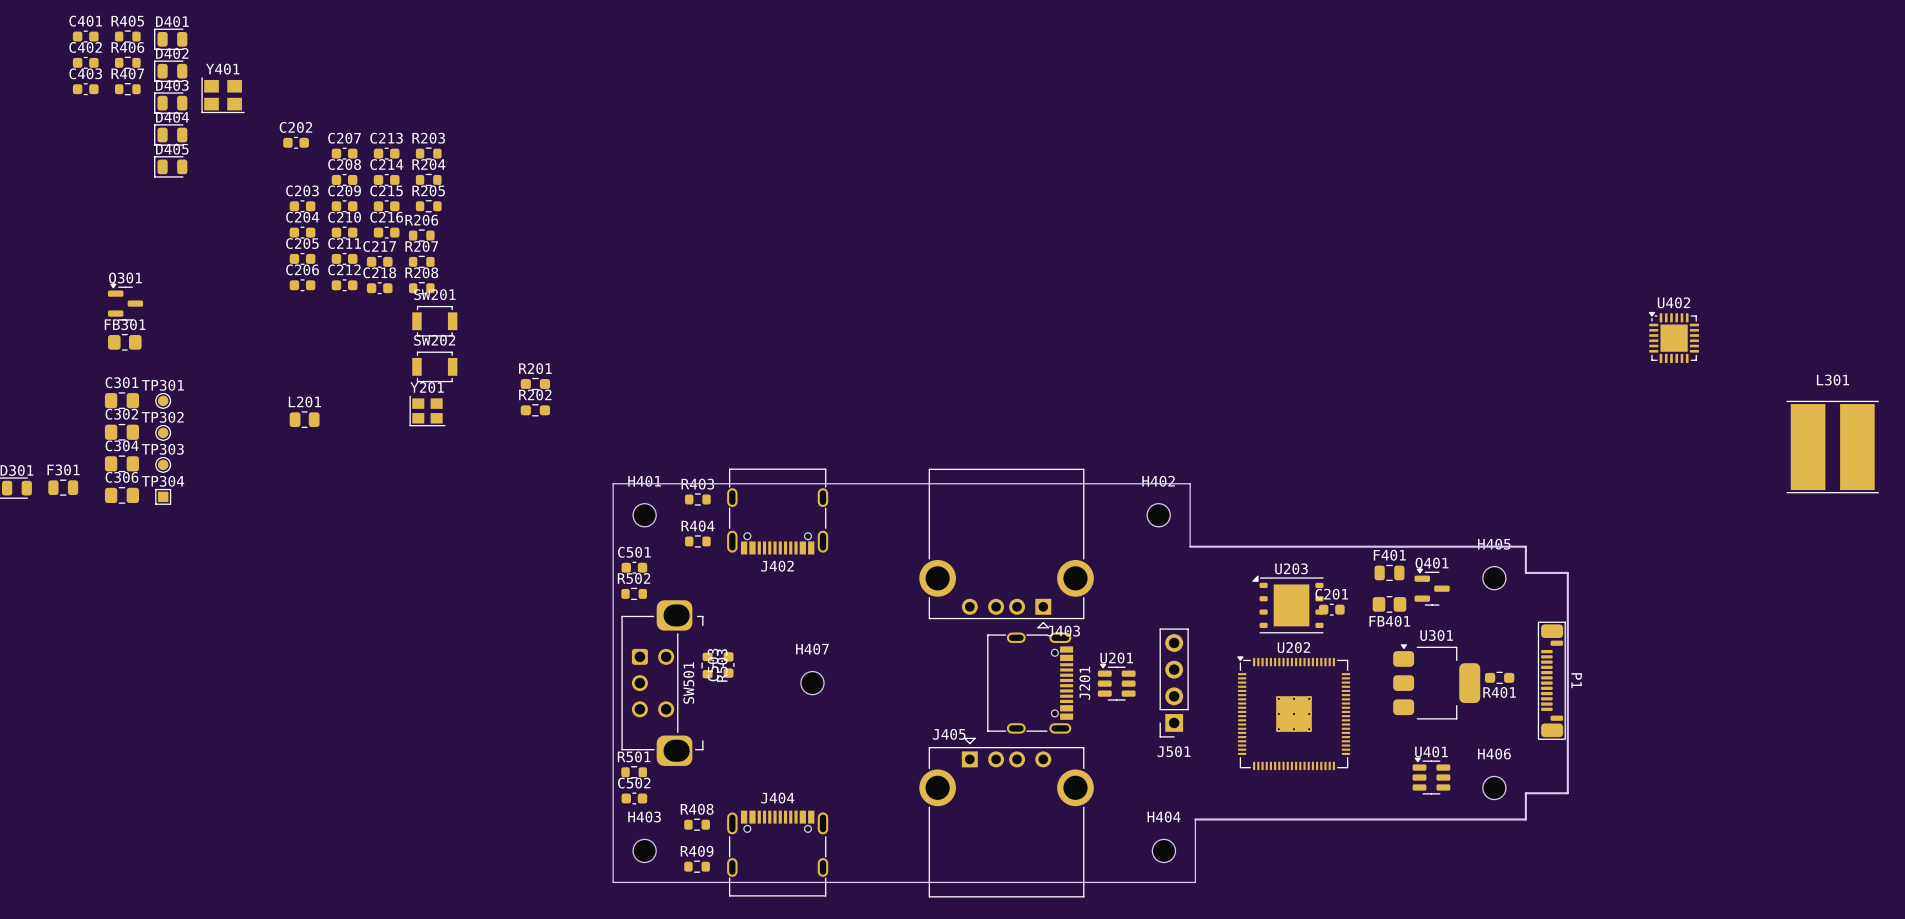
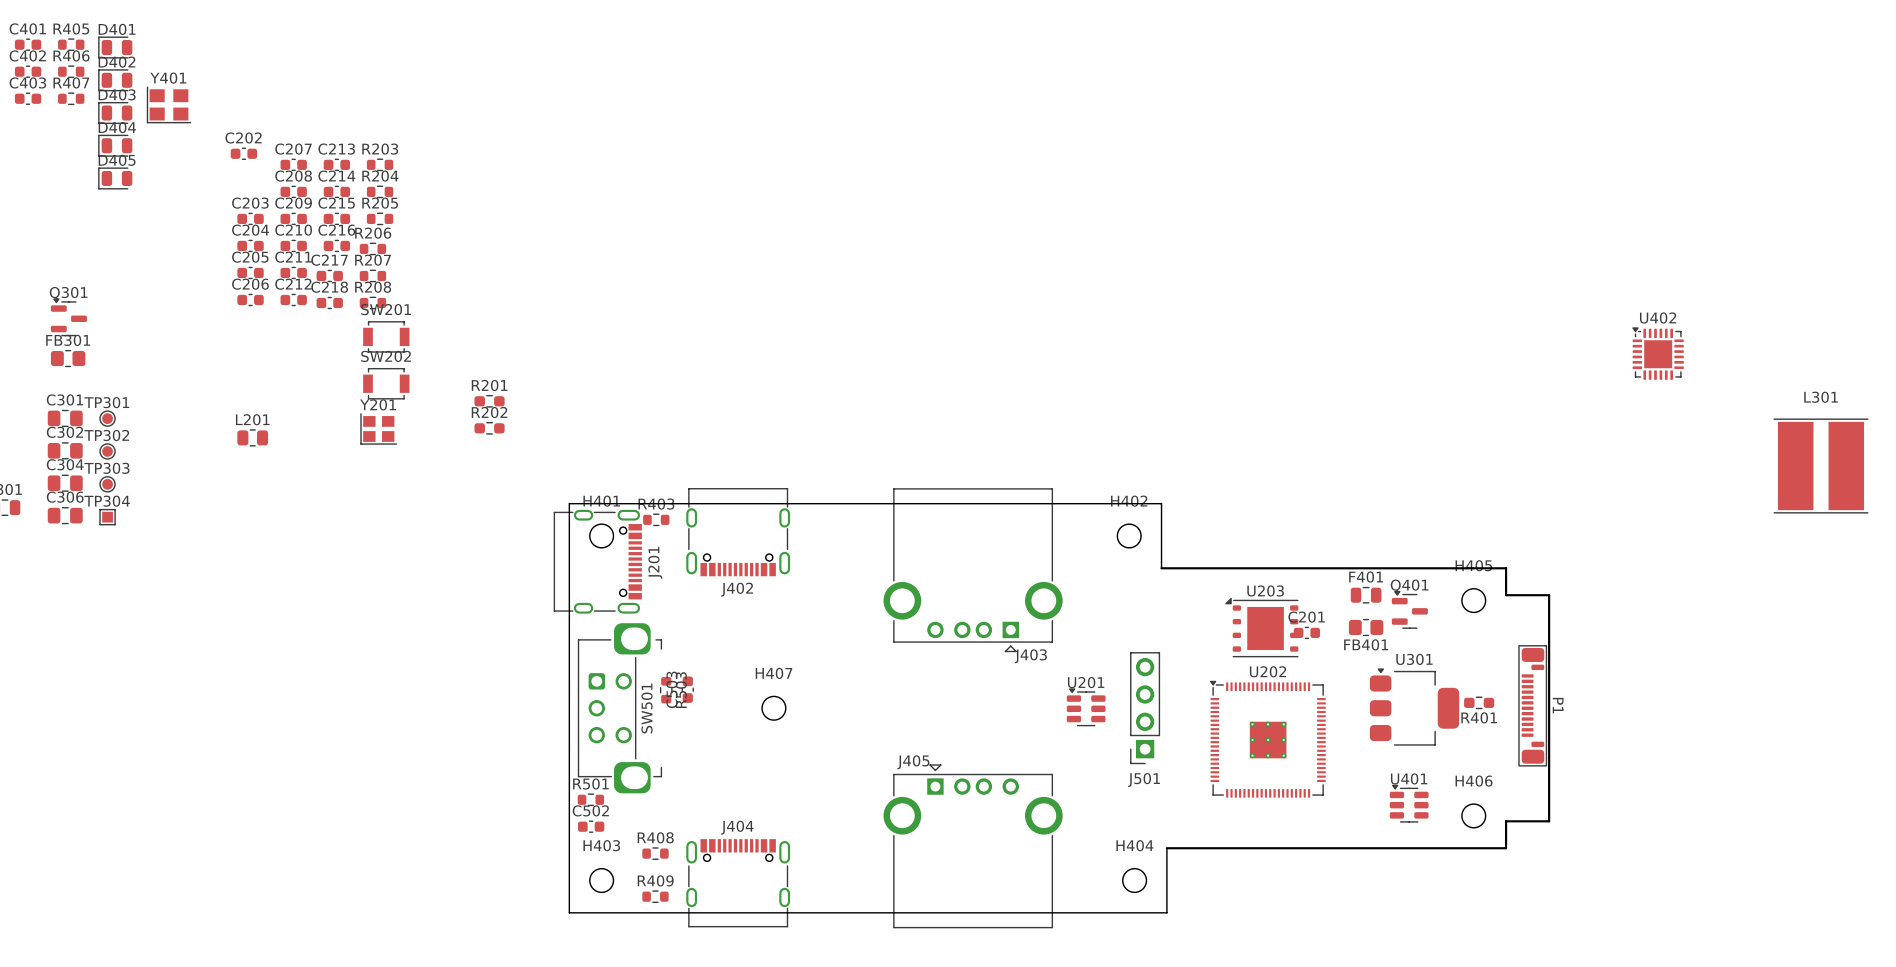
R404: (697, 541) -> none
C501: (634, 567) -> none
R502: (634, 593) -> none
J201 position: (1030, 683) -> (597, 561)

